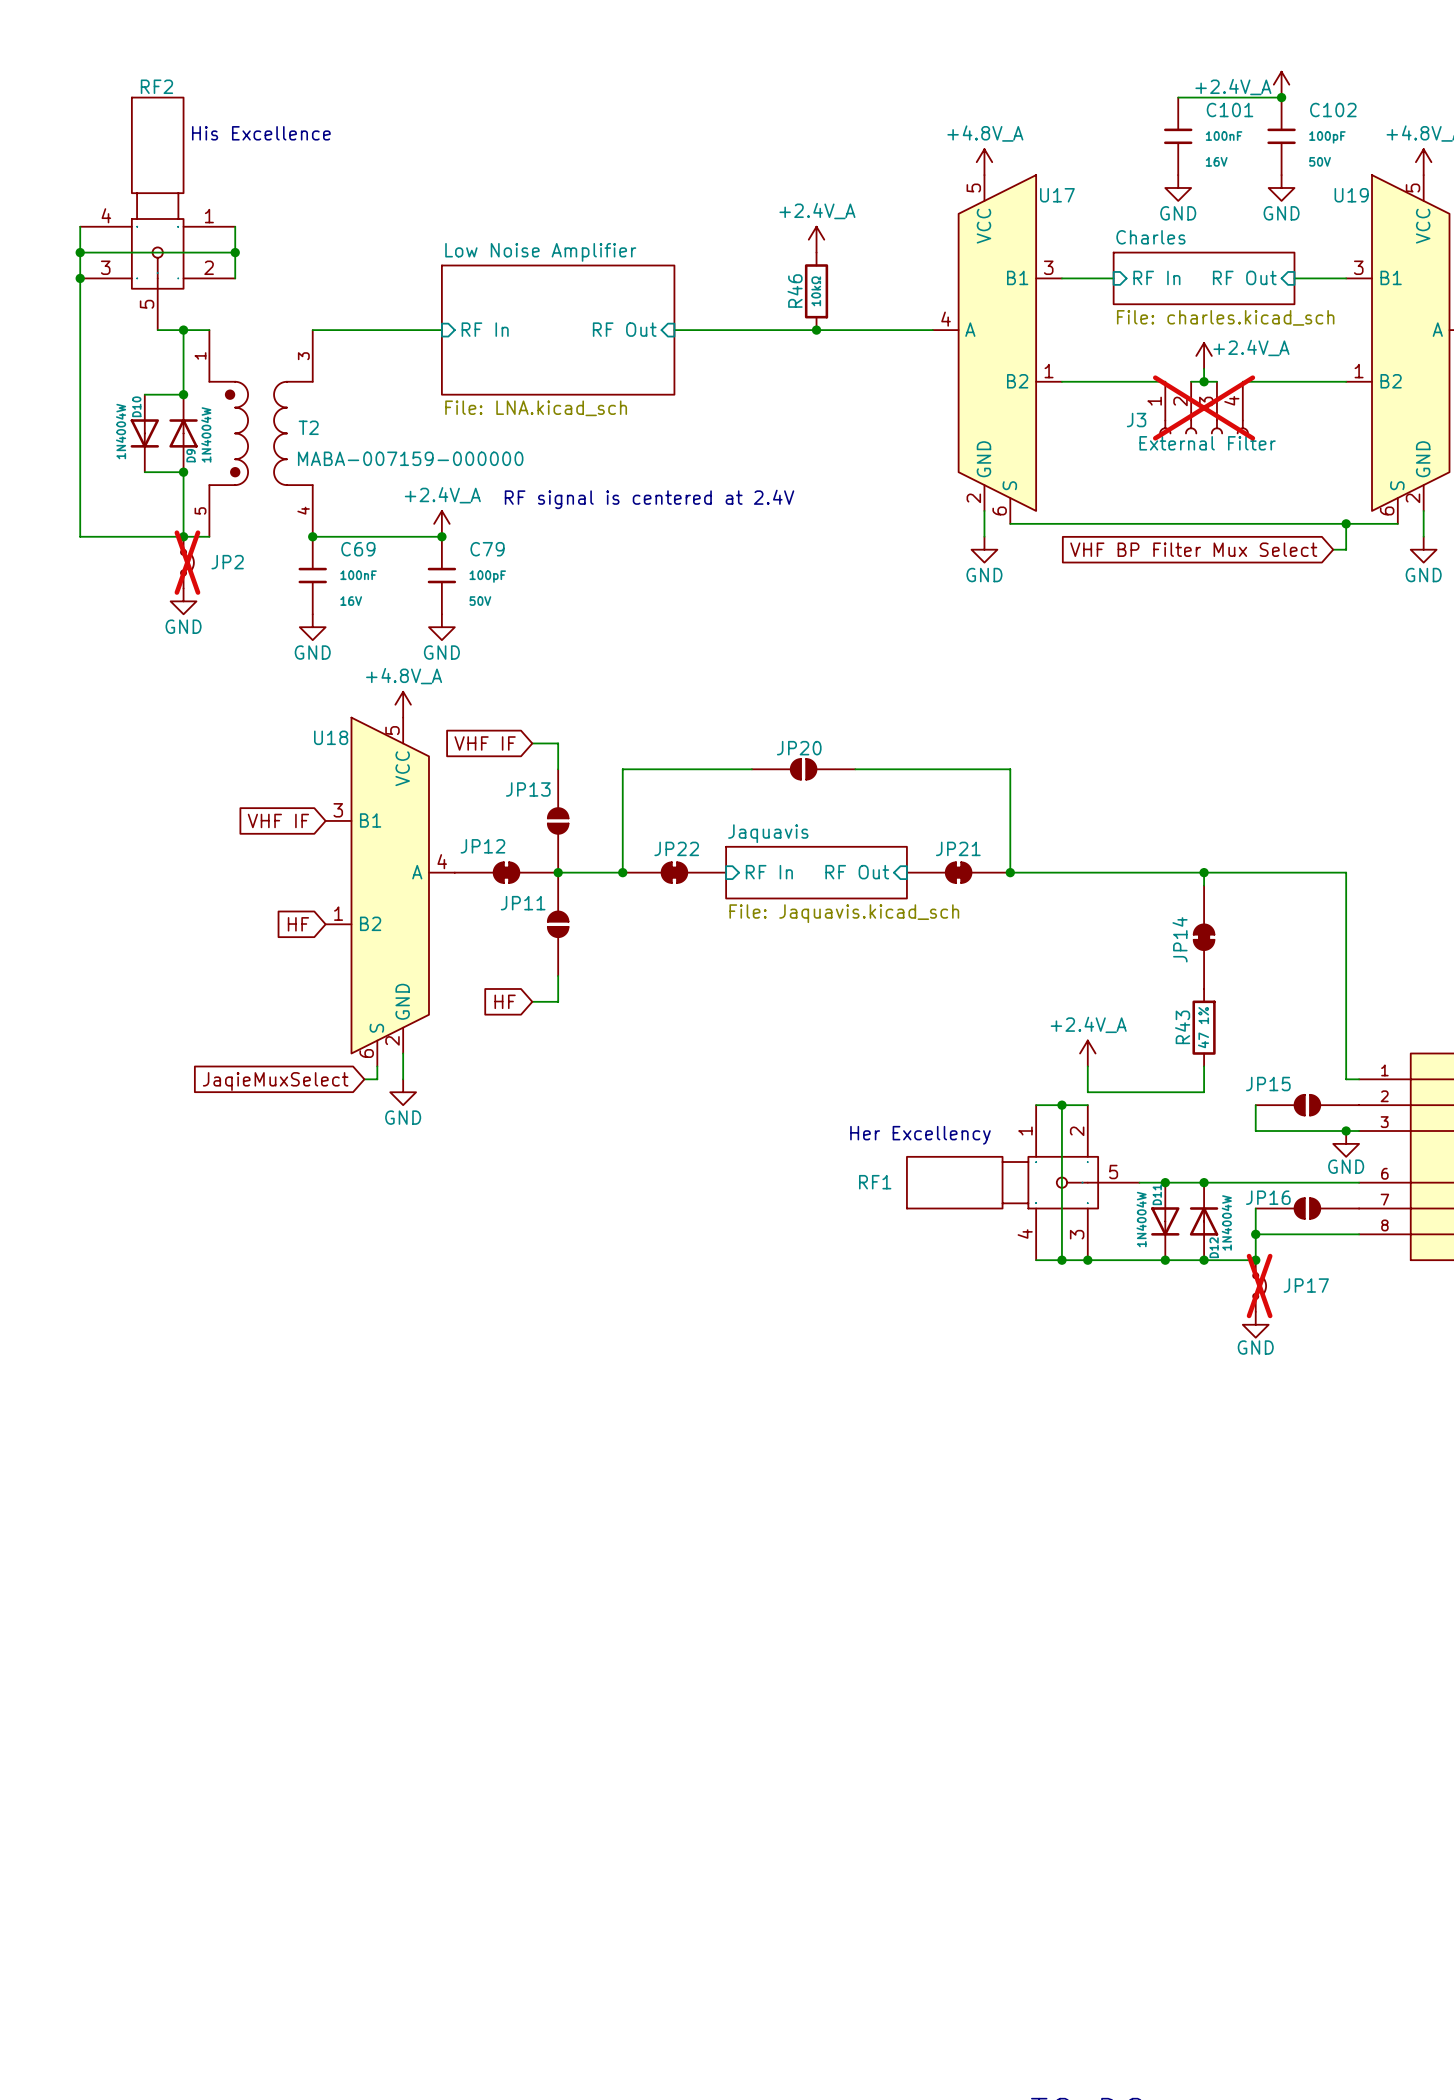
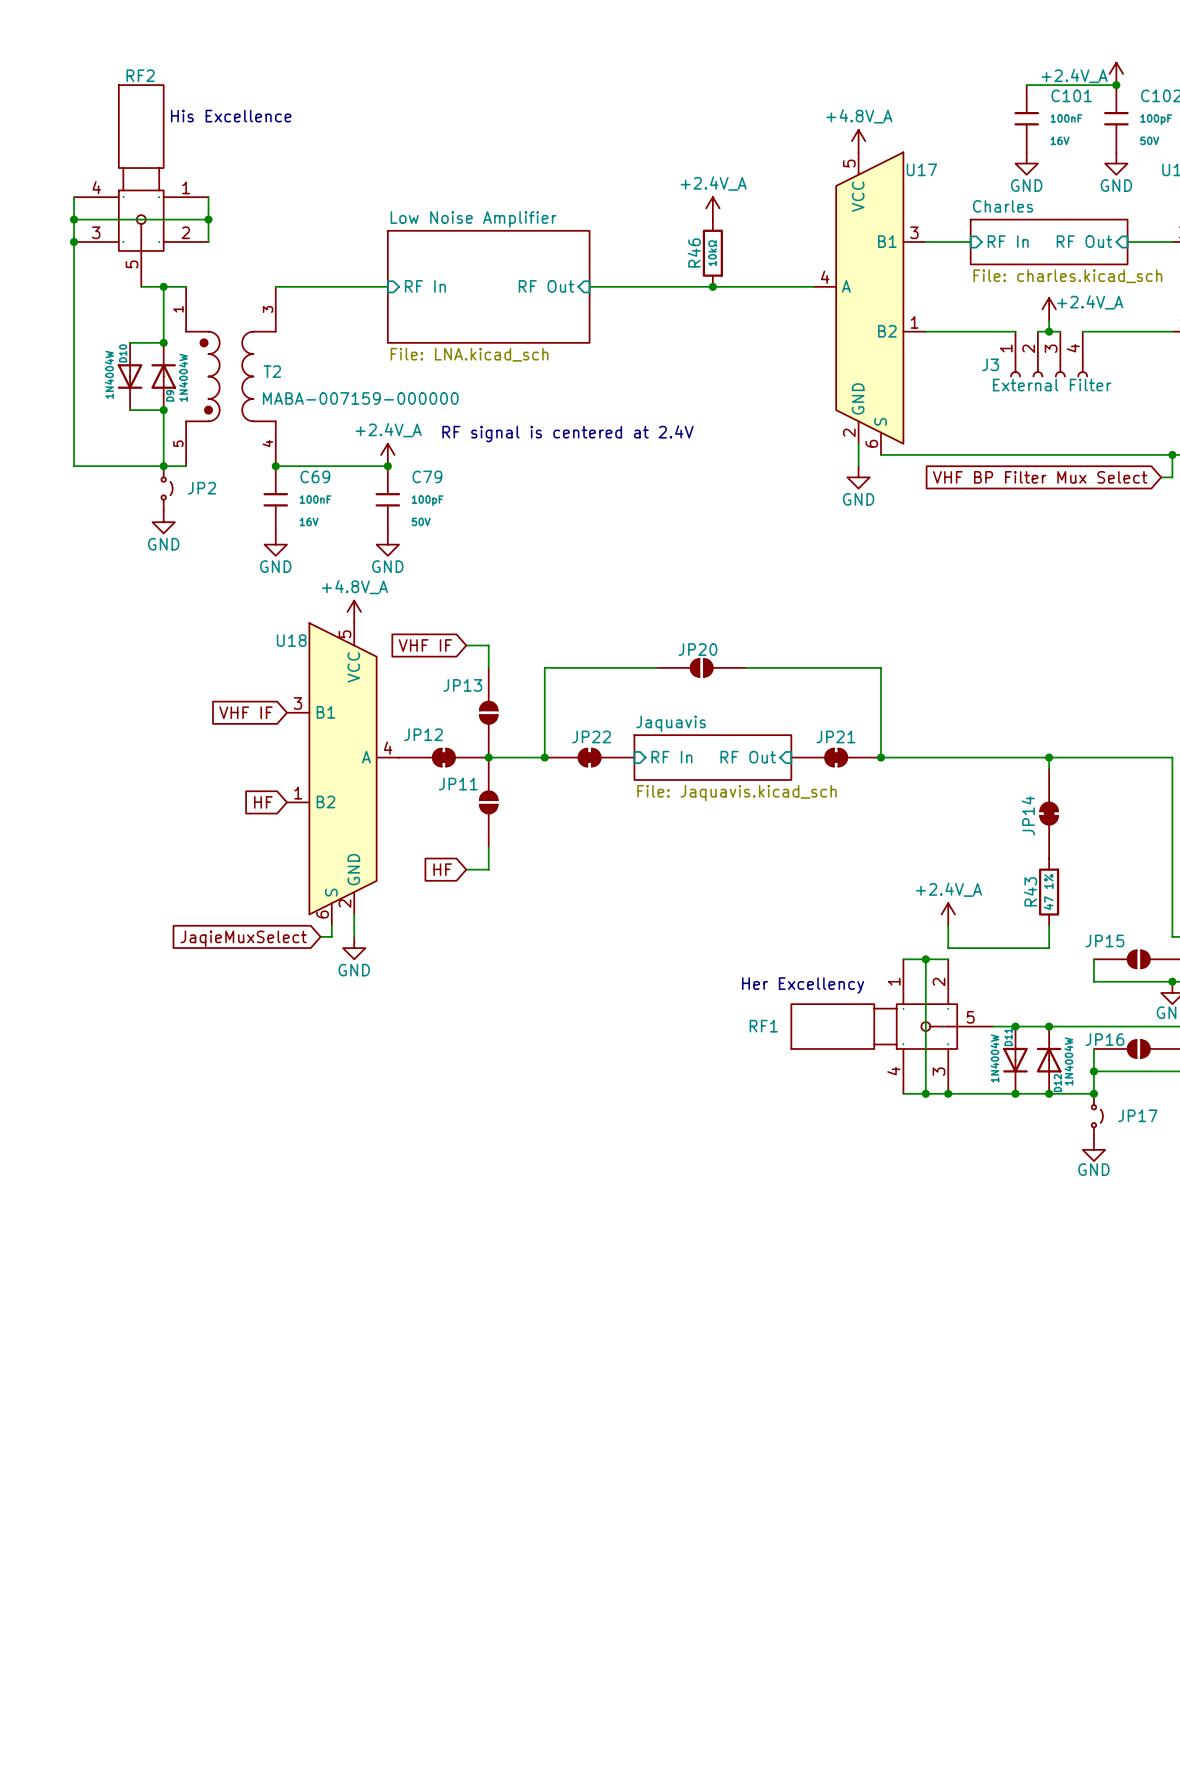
J3 do-not-place cross: (1204, 407) -> none
JP2 do-not-place cross: (187, 562) -> none
JP17 do-not-place cross: (1259, 1286) -> none

